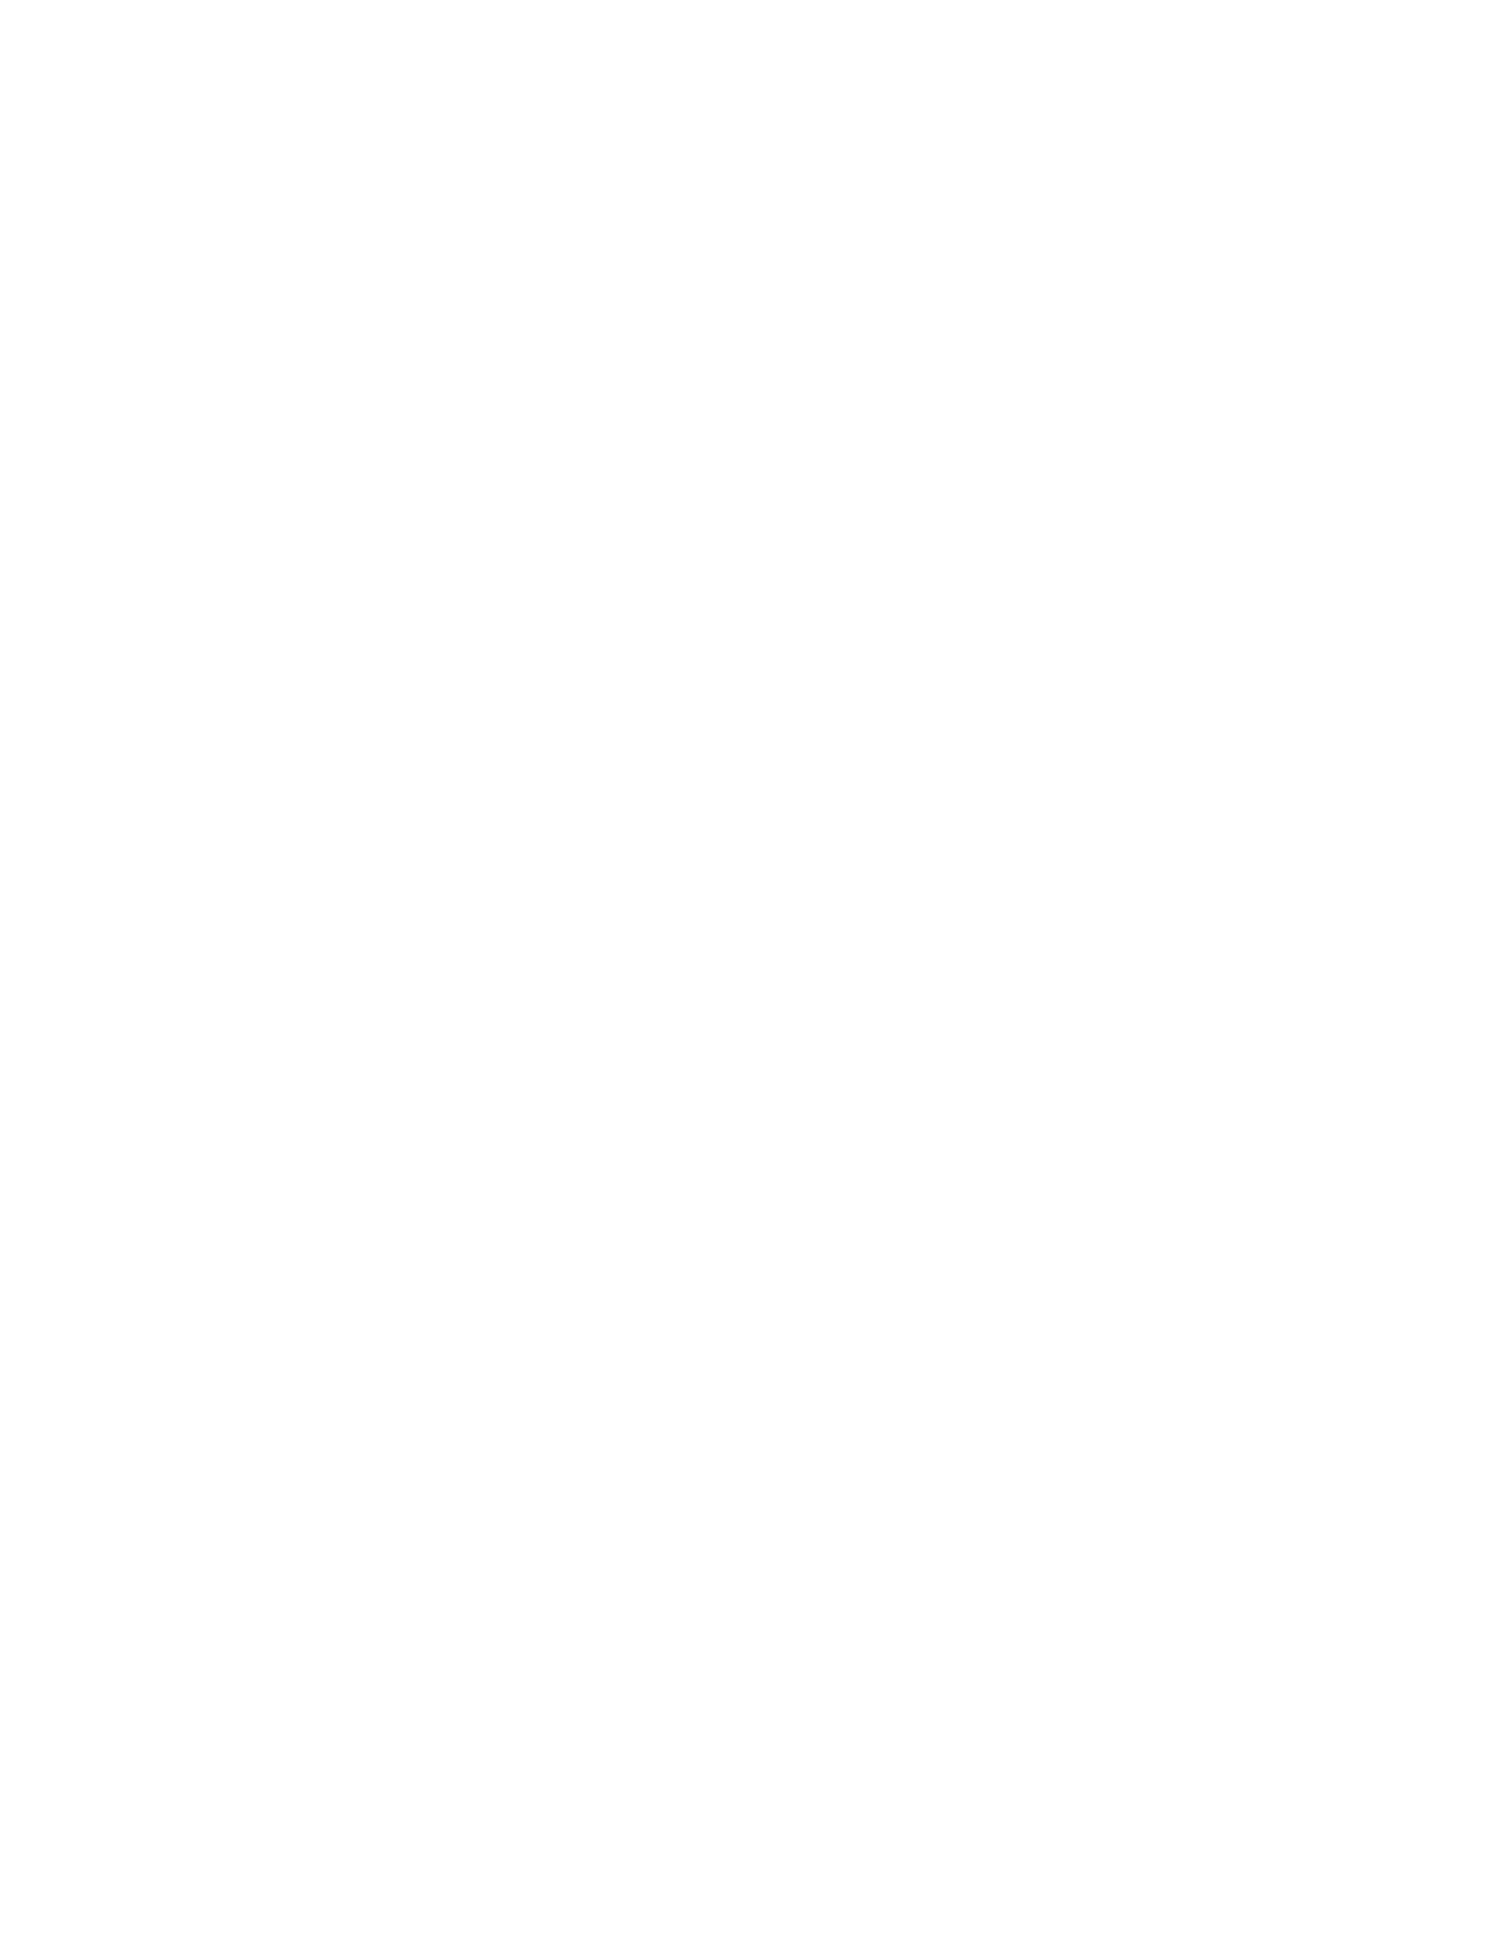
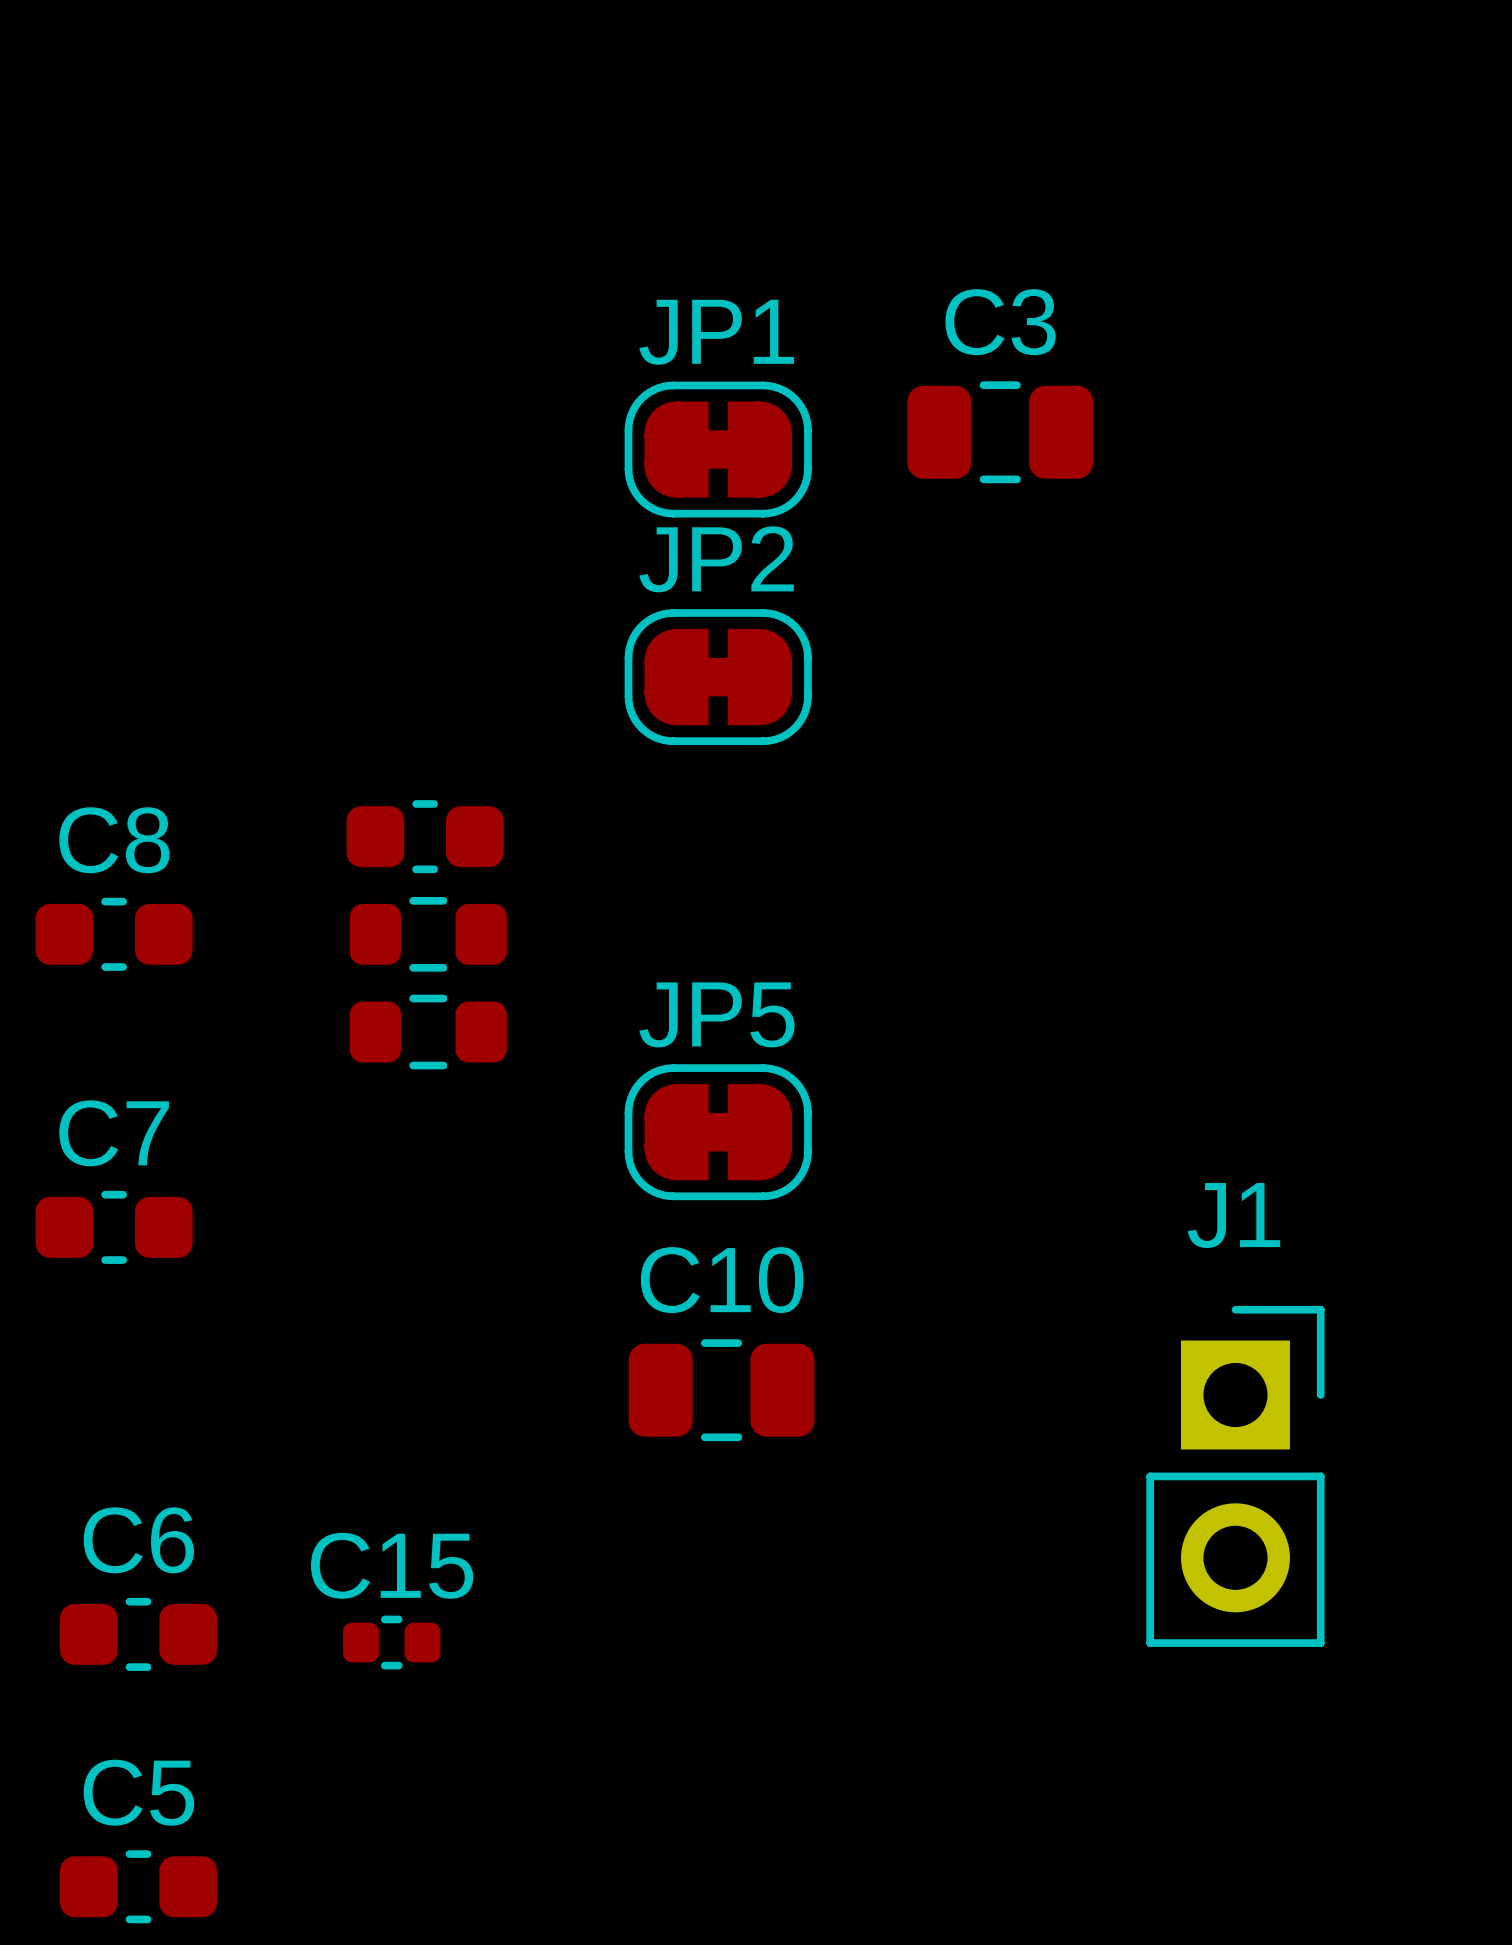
C3: none -> (1000, 432)
JP1: none -> (718, 449)
JP2: none -> (718, 677)
part: none -> (425, 836)
C8: none -> (114, 934)
part: none -> (428, 934)
part: none -> (428, 1032)
JP5: none -> (718, 1132)
C7: none -> (114, 1227)
C10: none -> (721, 1390)
J1: none -> (1235, 1476)
C6: none -> (138, 1634)
C15: none -> (391, 1642)
C5: none -> (138, 1886)

